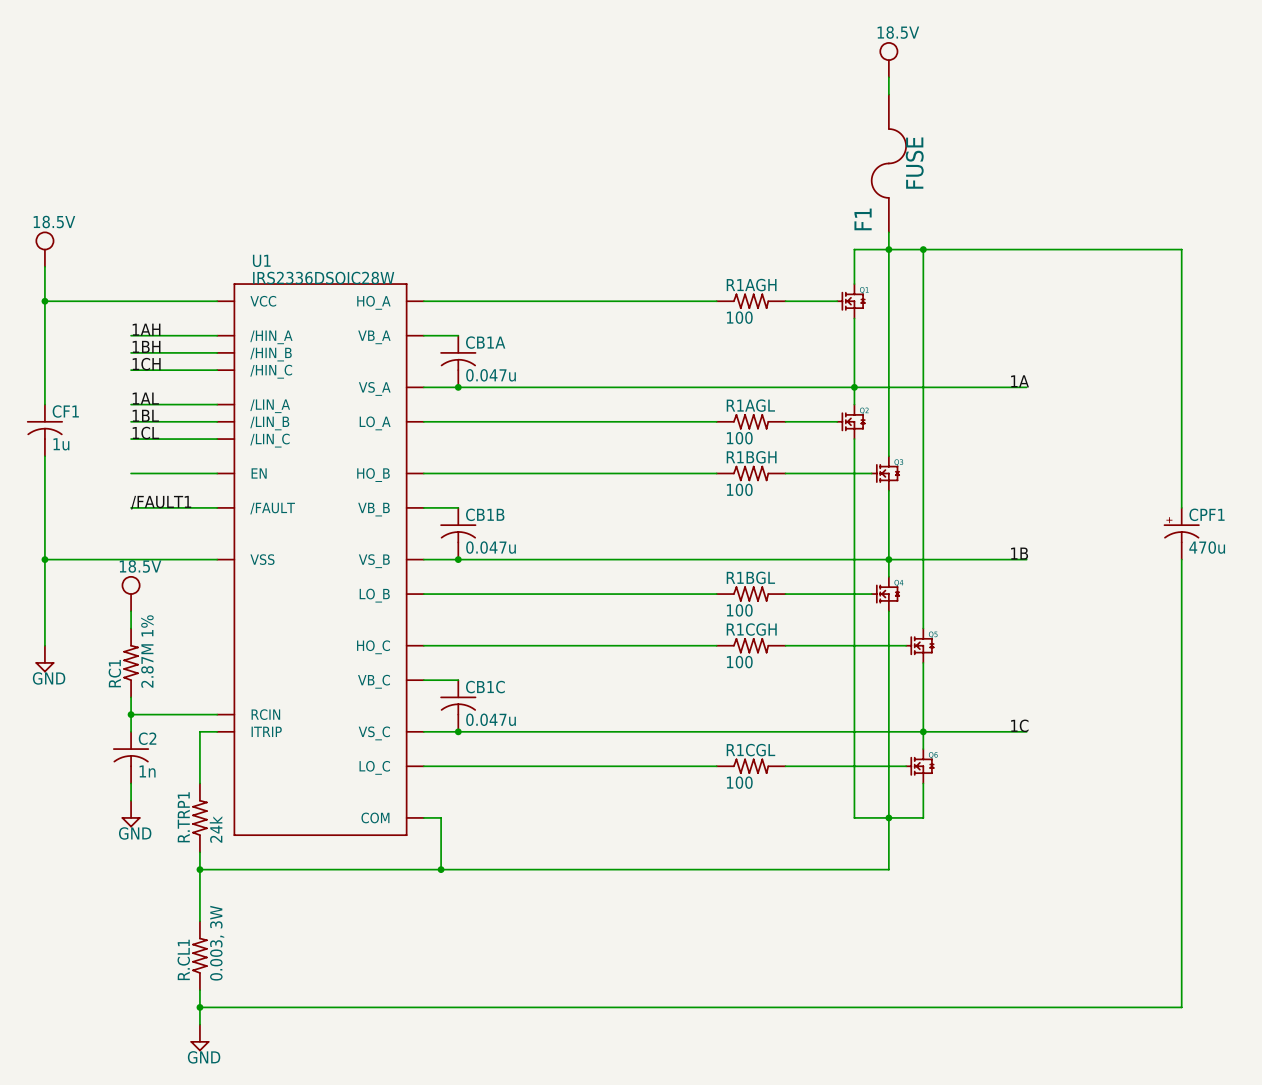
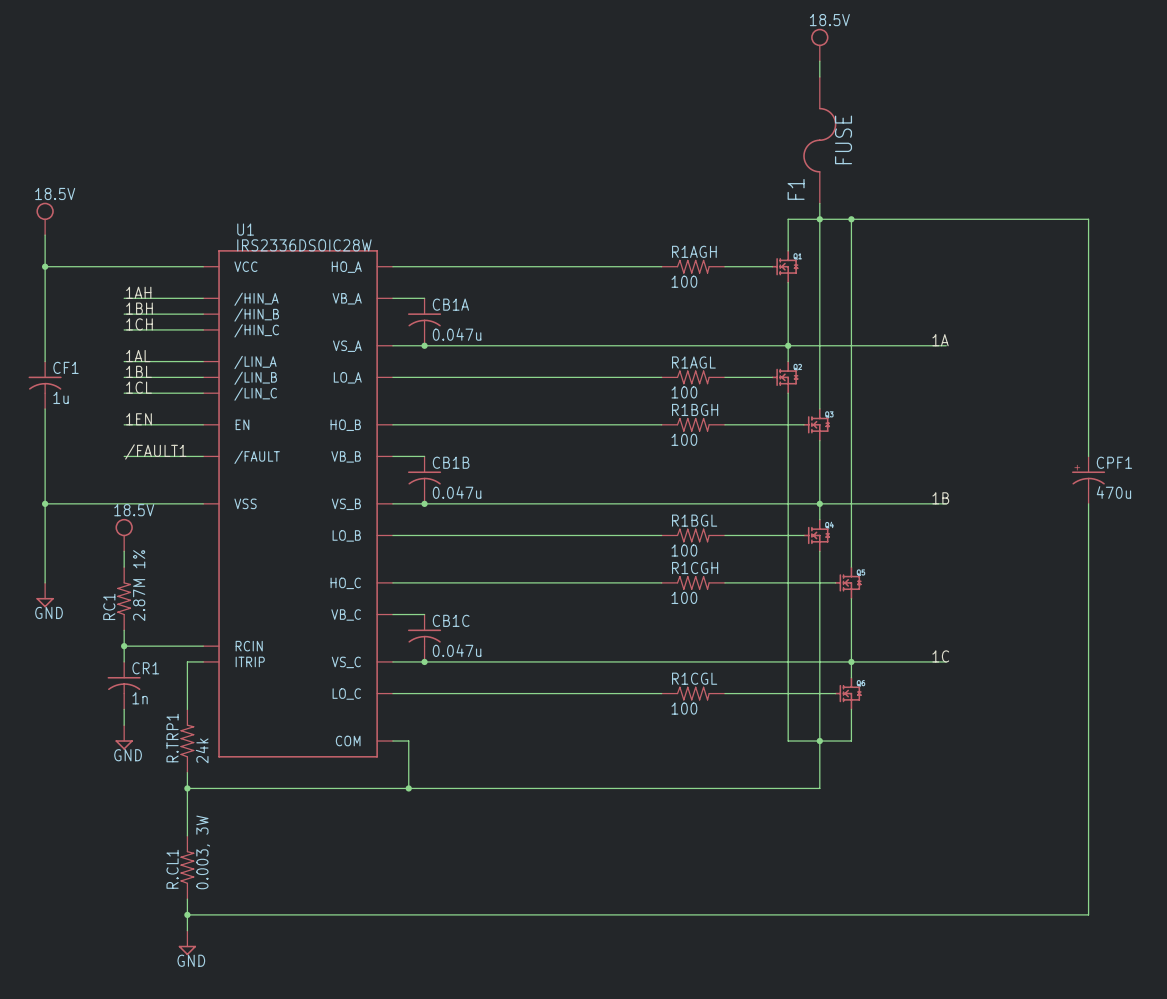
label: none -> 1EN (138, 419)
C2 name: C2 (147, 738) -> CR1 (145, 668)

